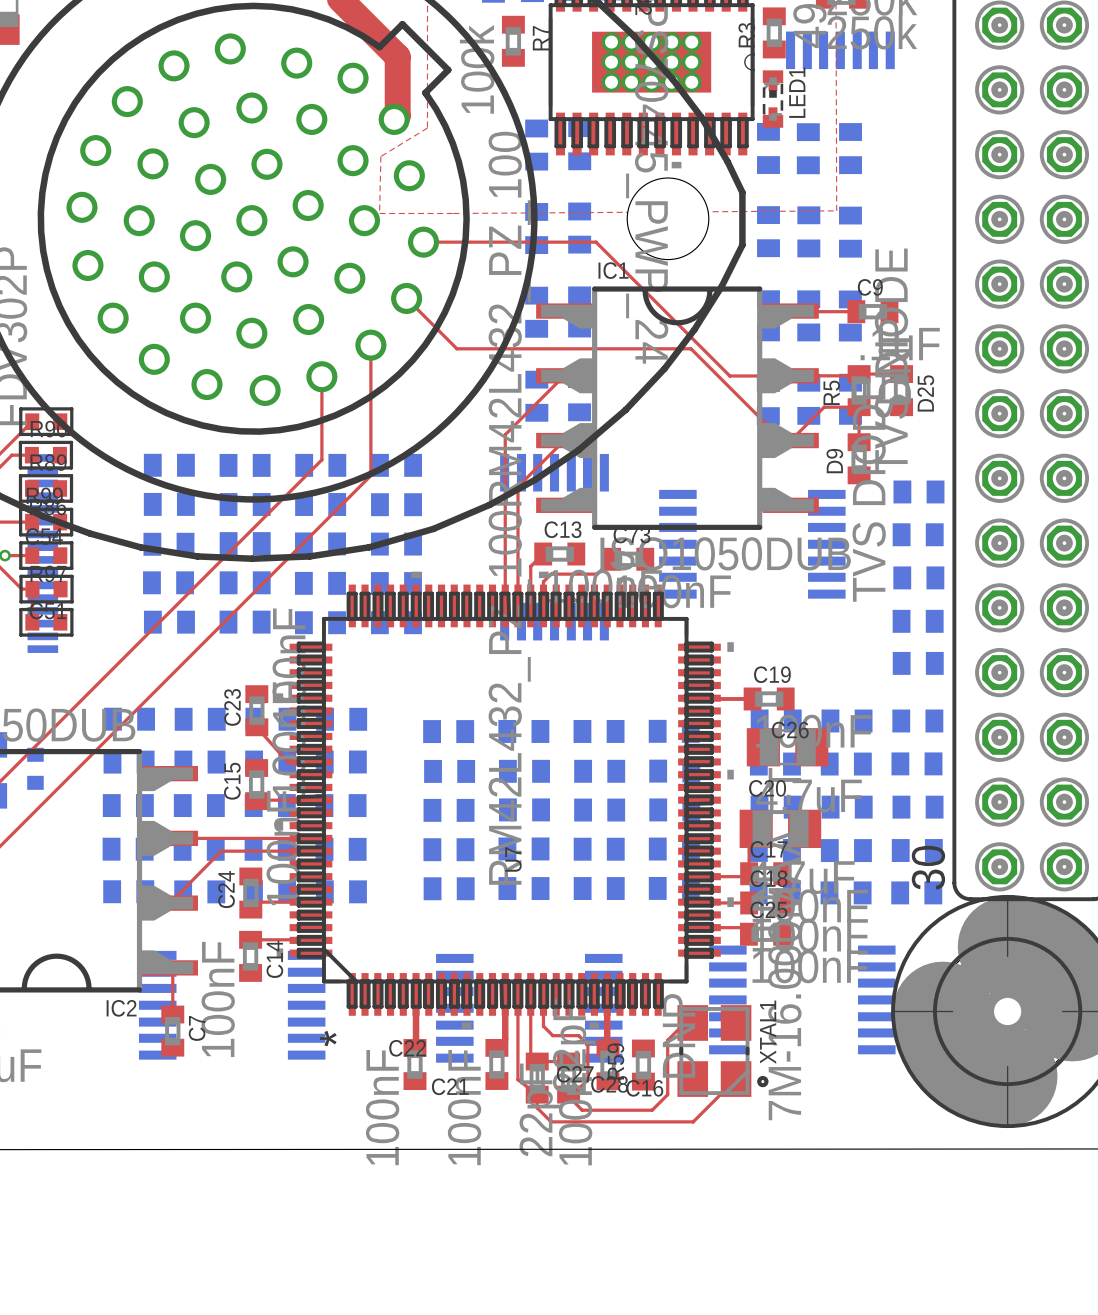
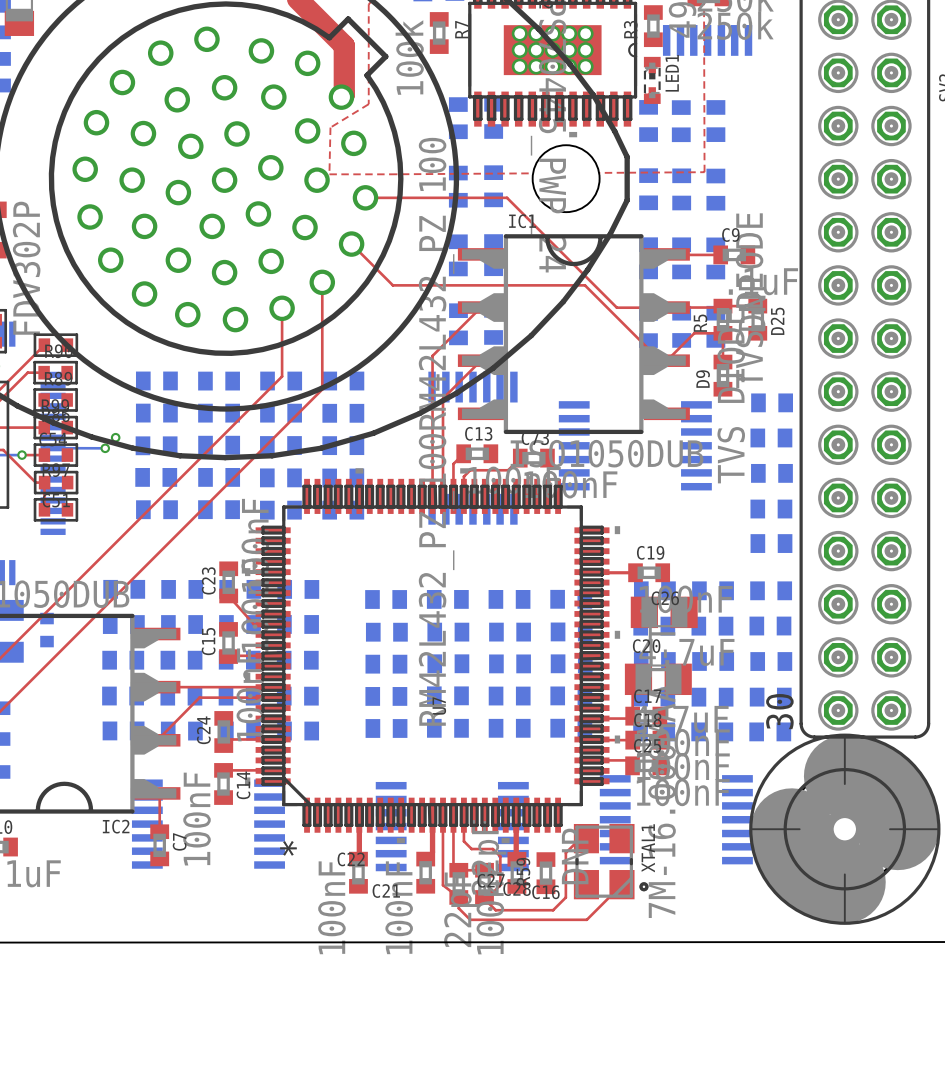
via: none -> (115, 437)
bottom track: none -> (53, 448) (105, 448)
via: none -> (105, 448)

